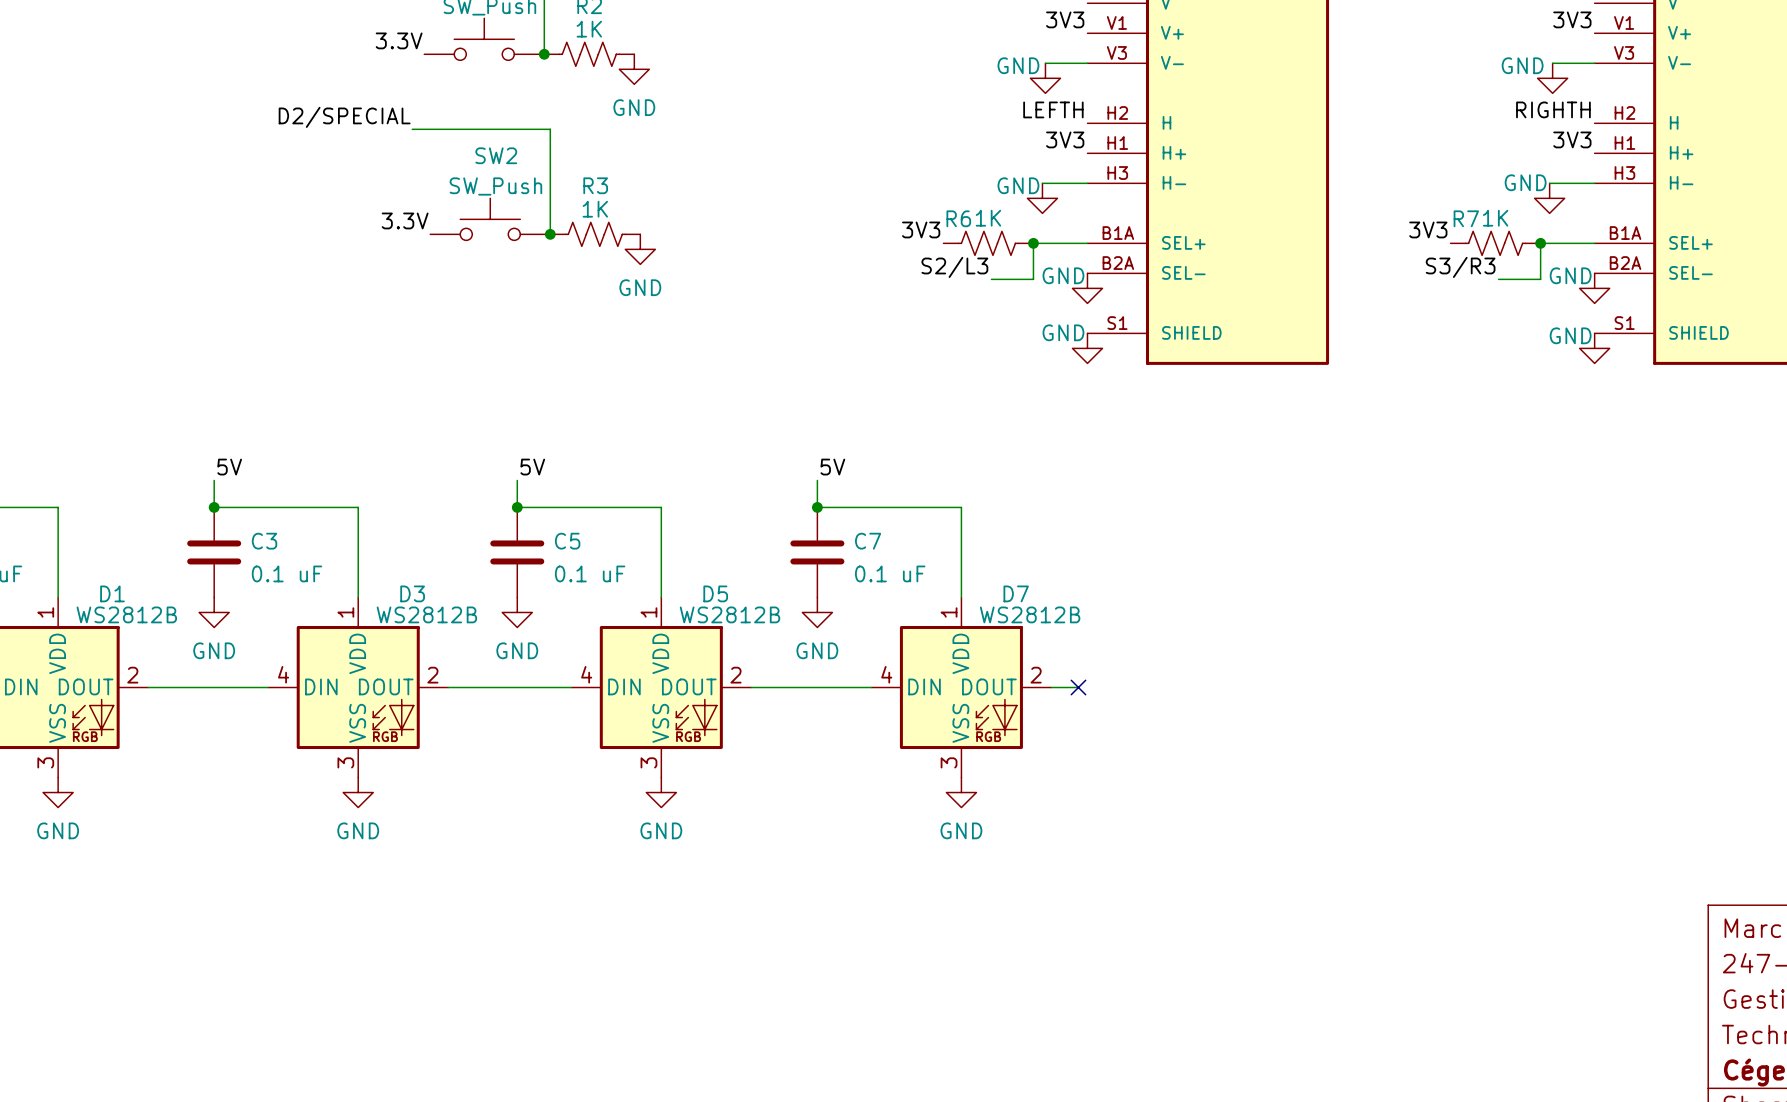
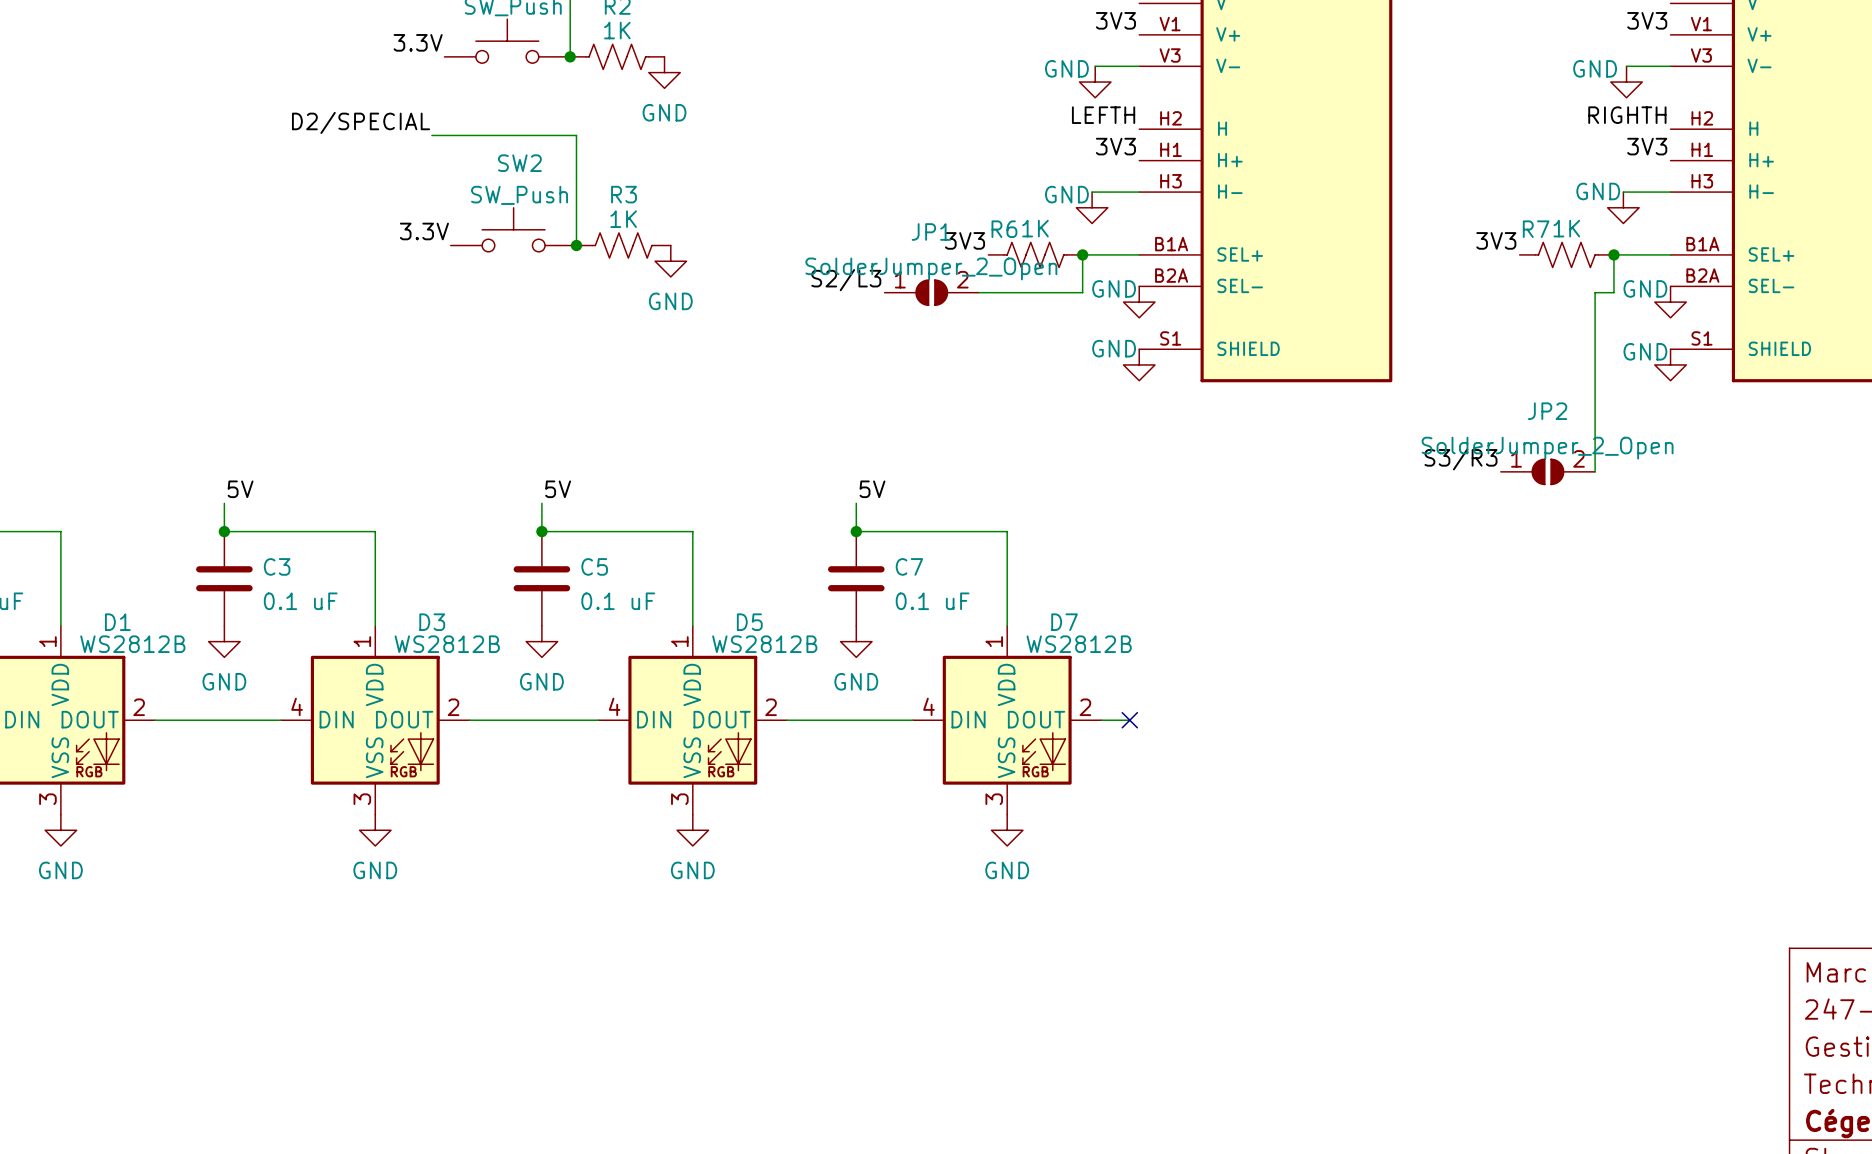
label position: S2/L3 (954, 267) -> S2/L3 (846, 280)
label position: S3/R3 (1460, 267) -> S3/R3 (1460, 459)
JP1: none -> SolderJumper_2_Open (931, 292)
wire: none -> (978, 292) (1038, 292)
wire: (1498, 279) (1522, 279) -> (1595, 471) (1595, 292)
JP2: none -> SolderJumper_2_Open (1547, 471)

